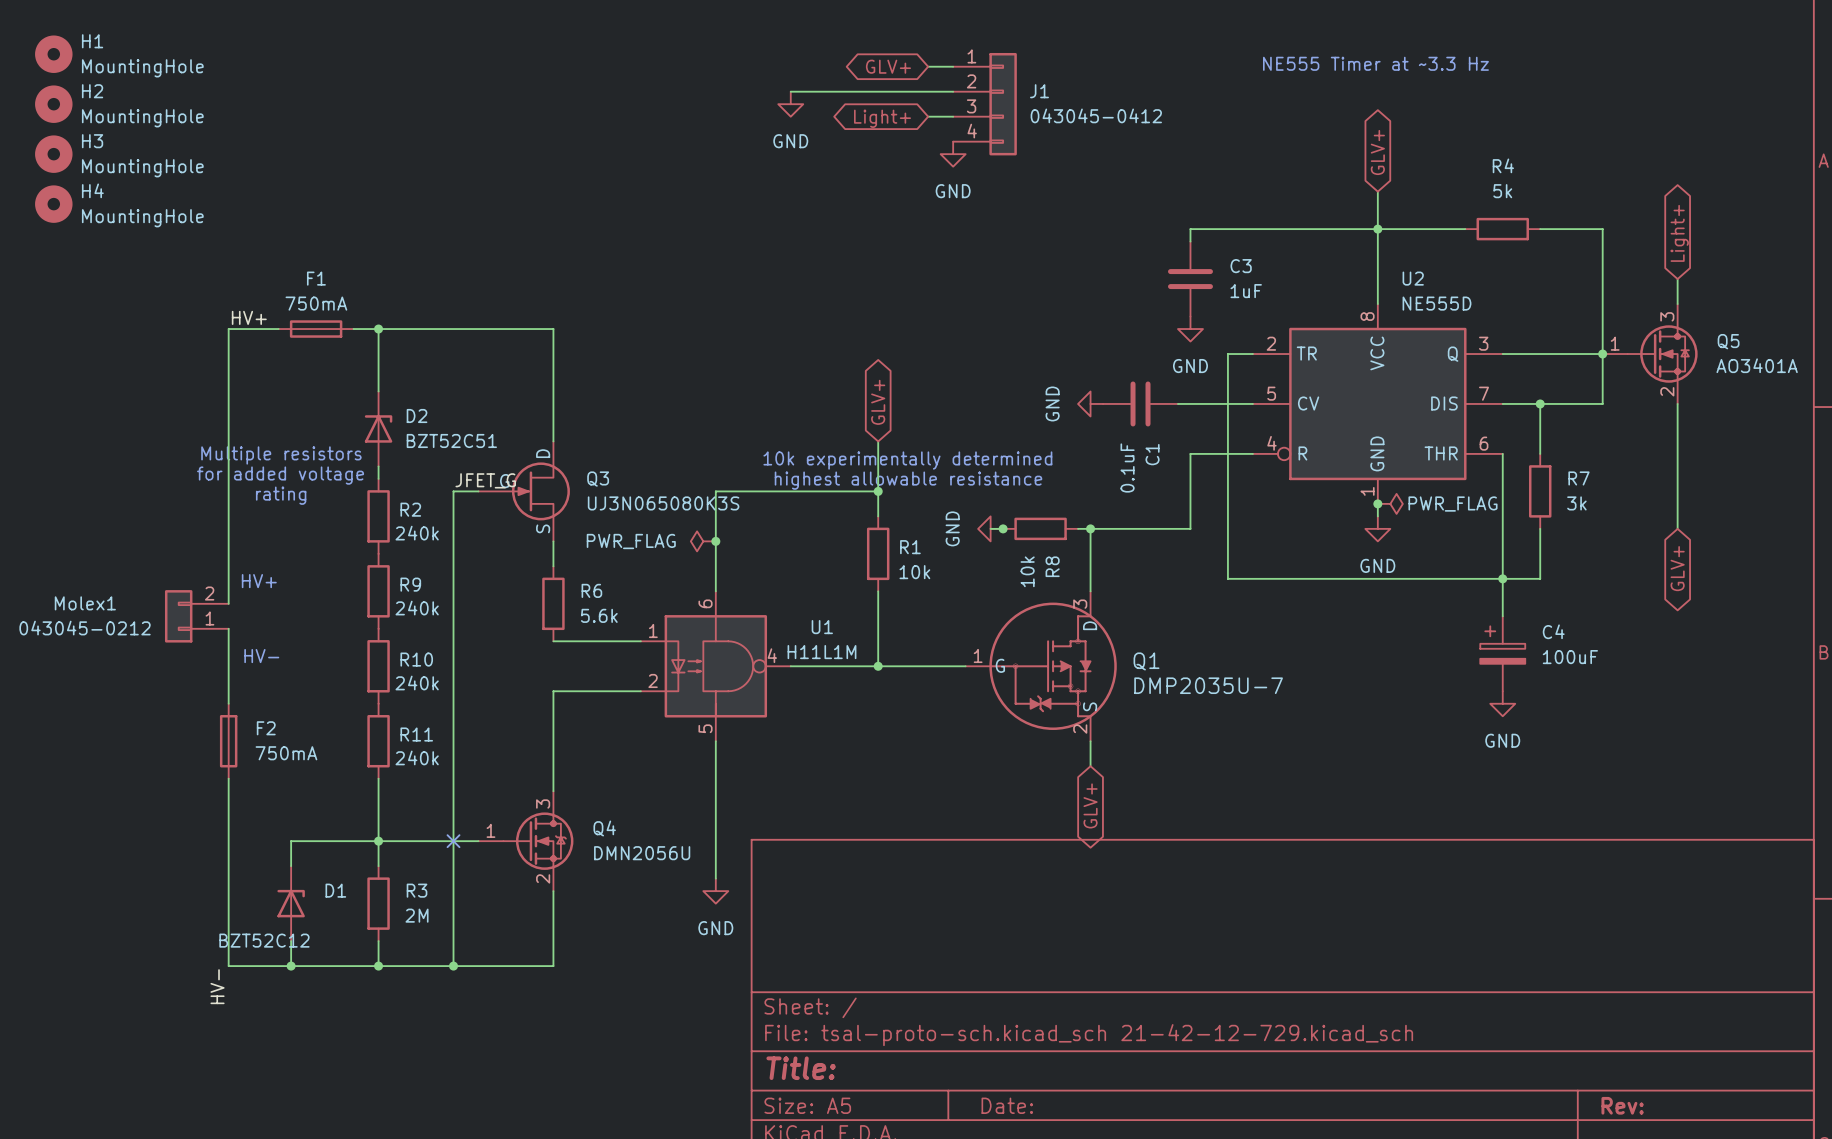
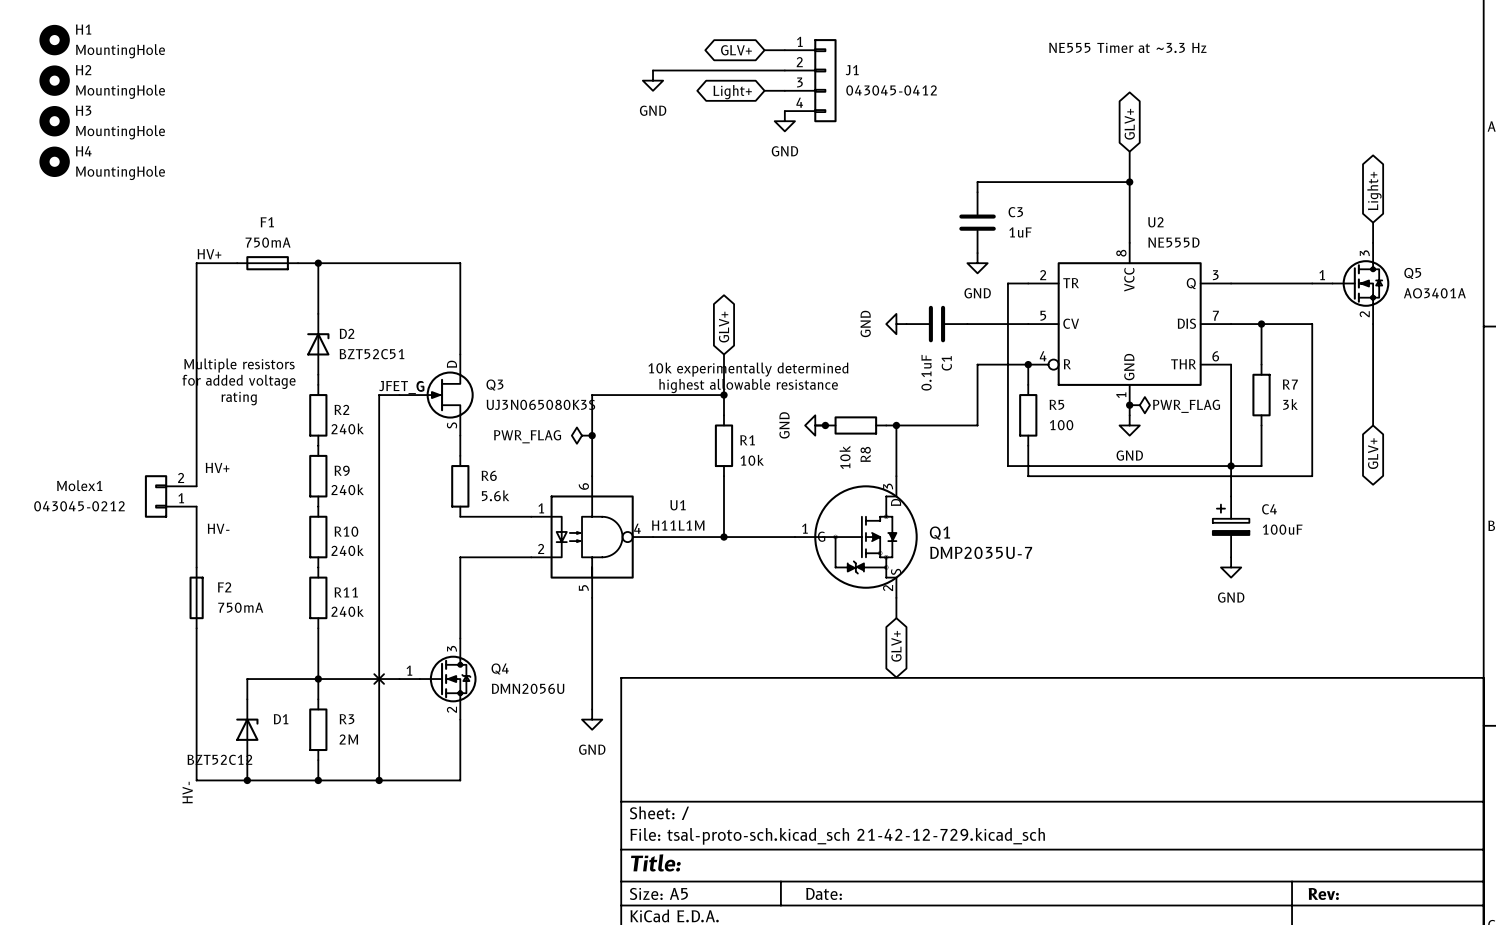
wire: (1377, 229) (1465, 229) -> none
R4: 5k (1502, 229) -> none
wire: (1540, 229) (1602, 229) (1602, 403) -> (1028, 445) (1028, 476) (1312, 476) (1312, 324)
junction: (1602, 354) -> none
wire: none -> (1028, 364) (1028, 384)
junction: none -> (1028, 364)
R5: none -> 100 (1028, 415)

